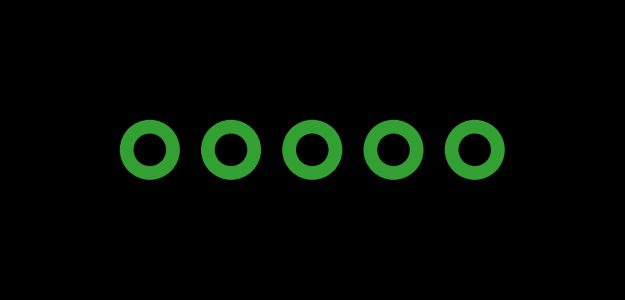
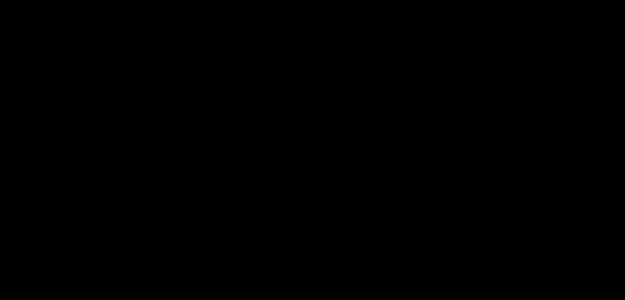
part: (312, 149) -> none

